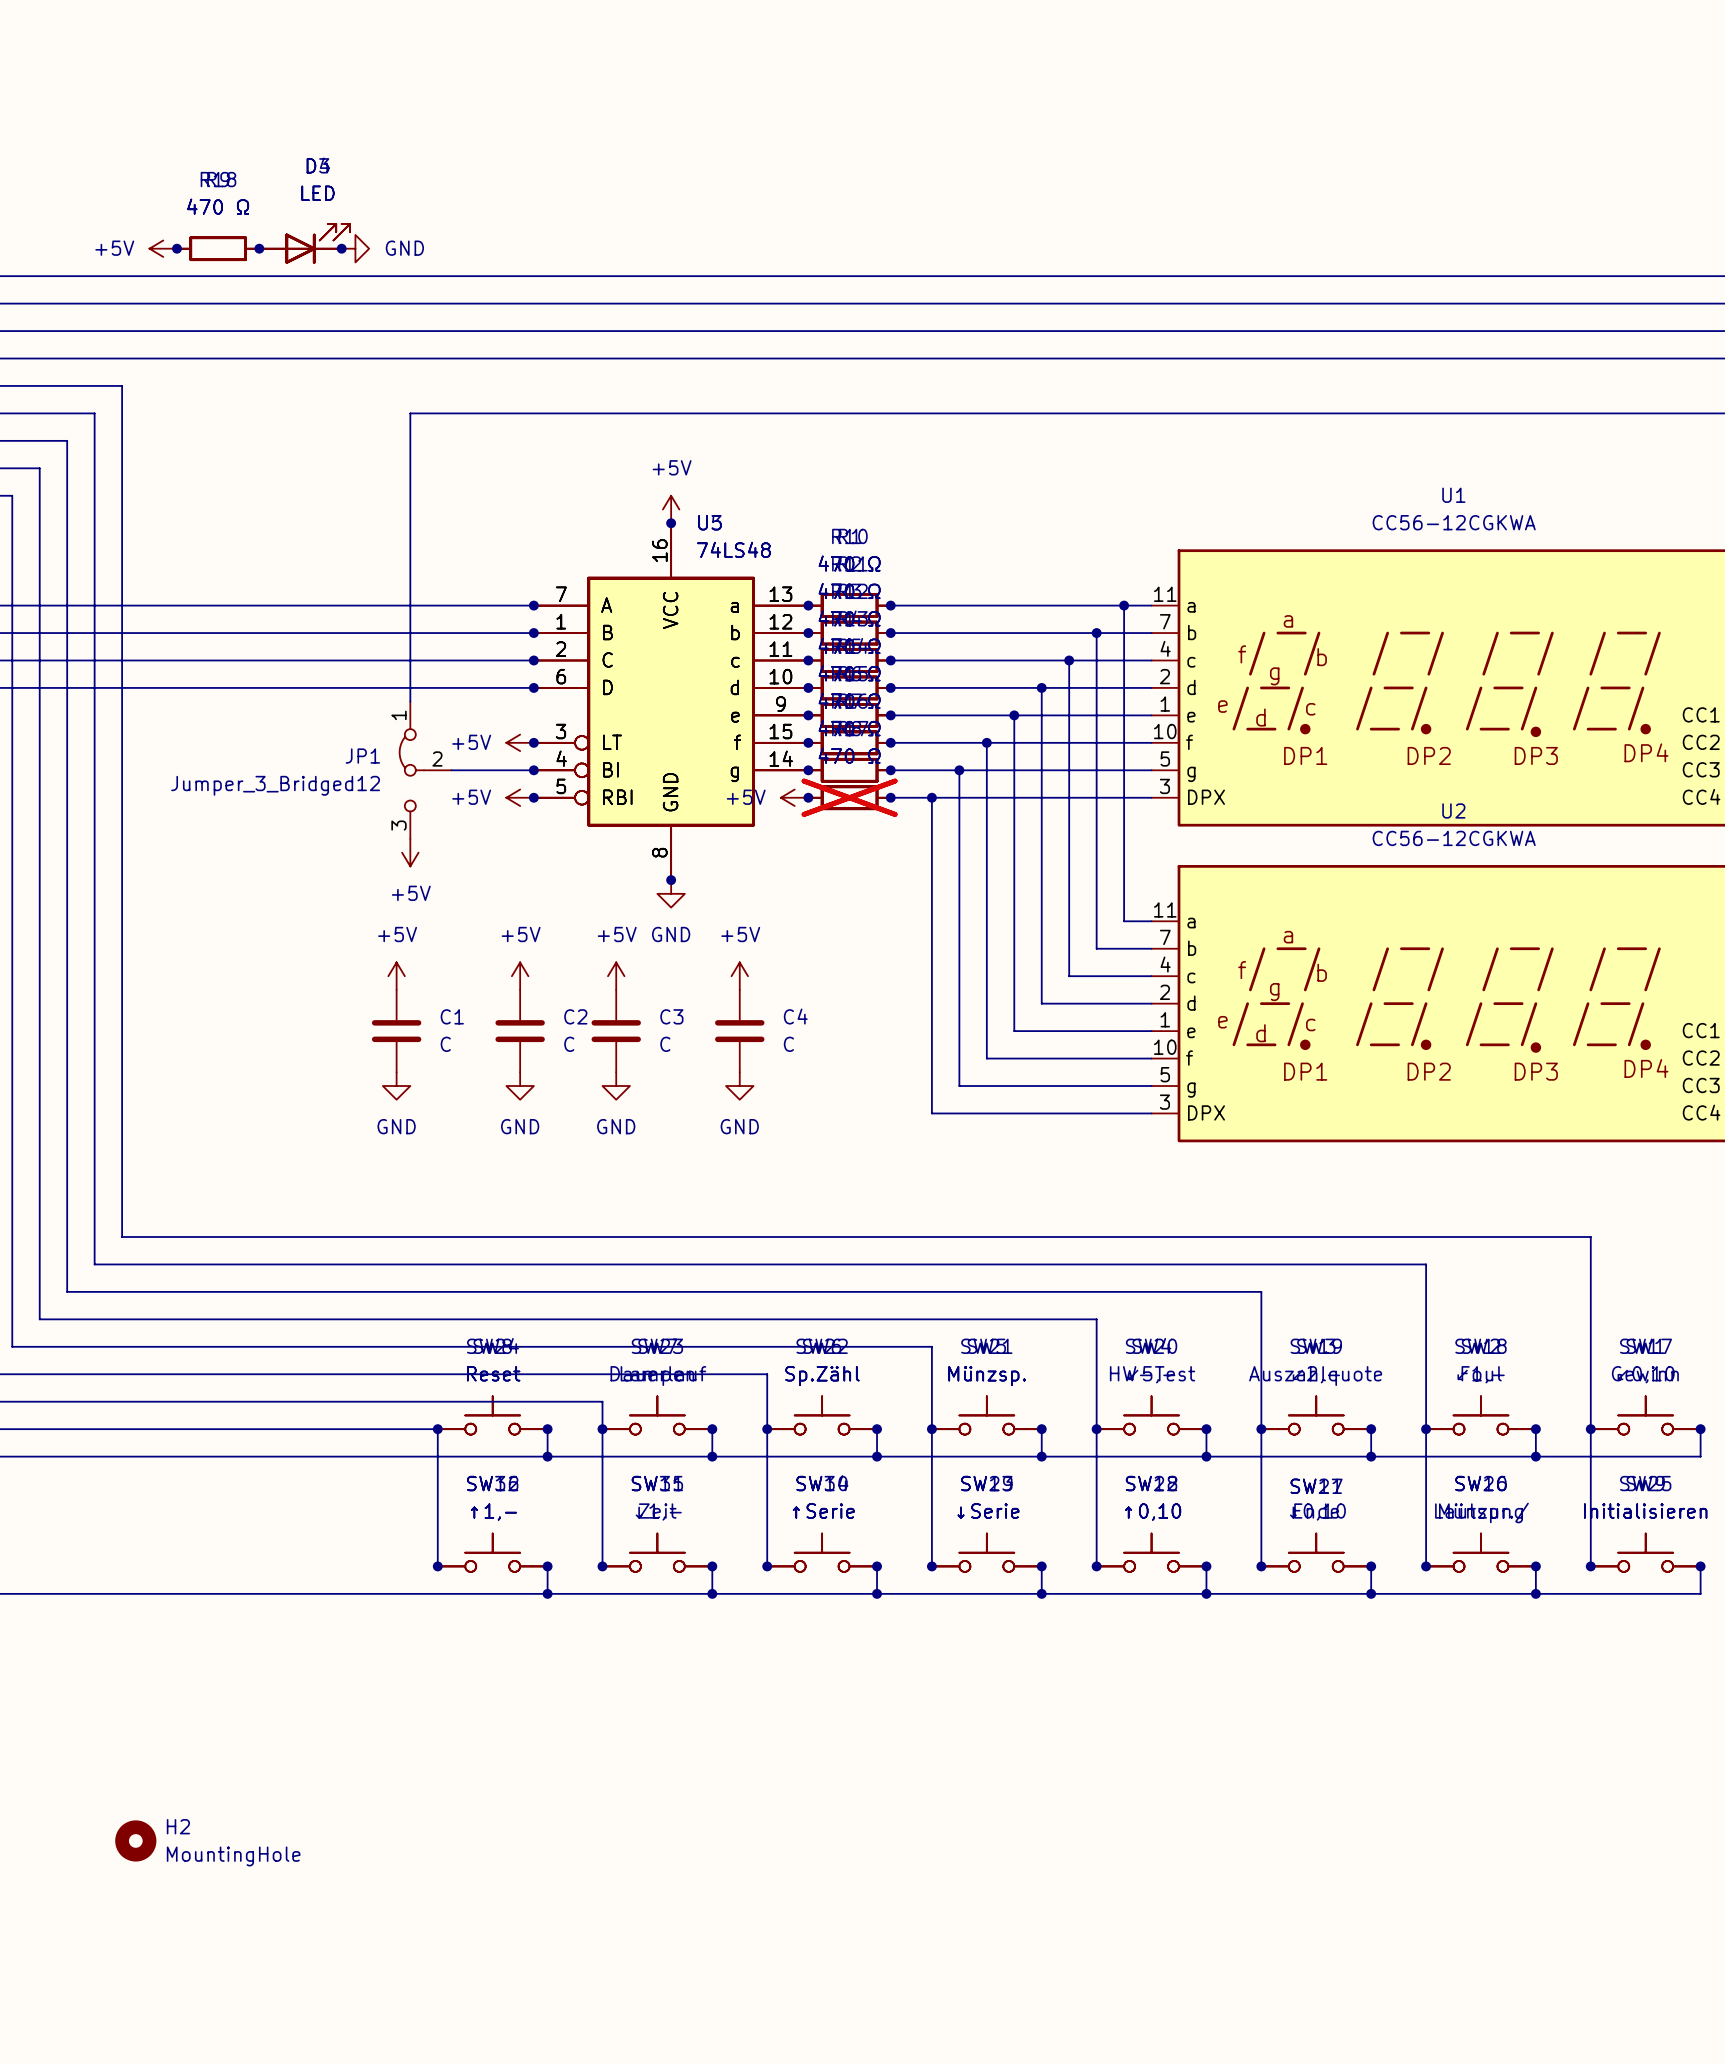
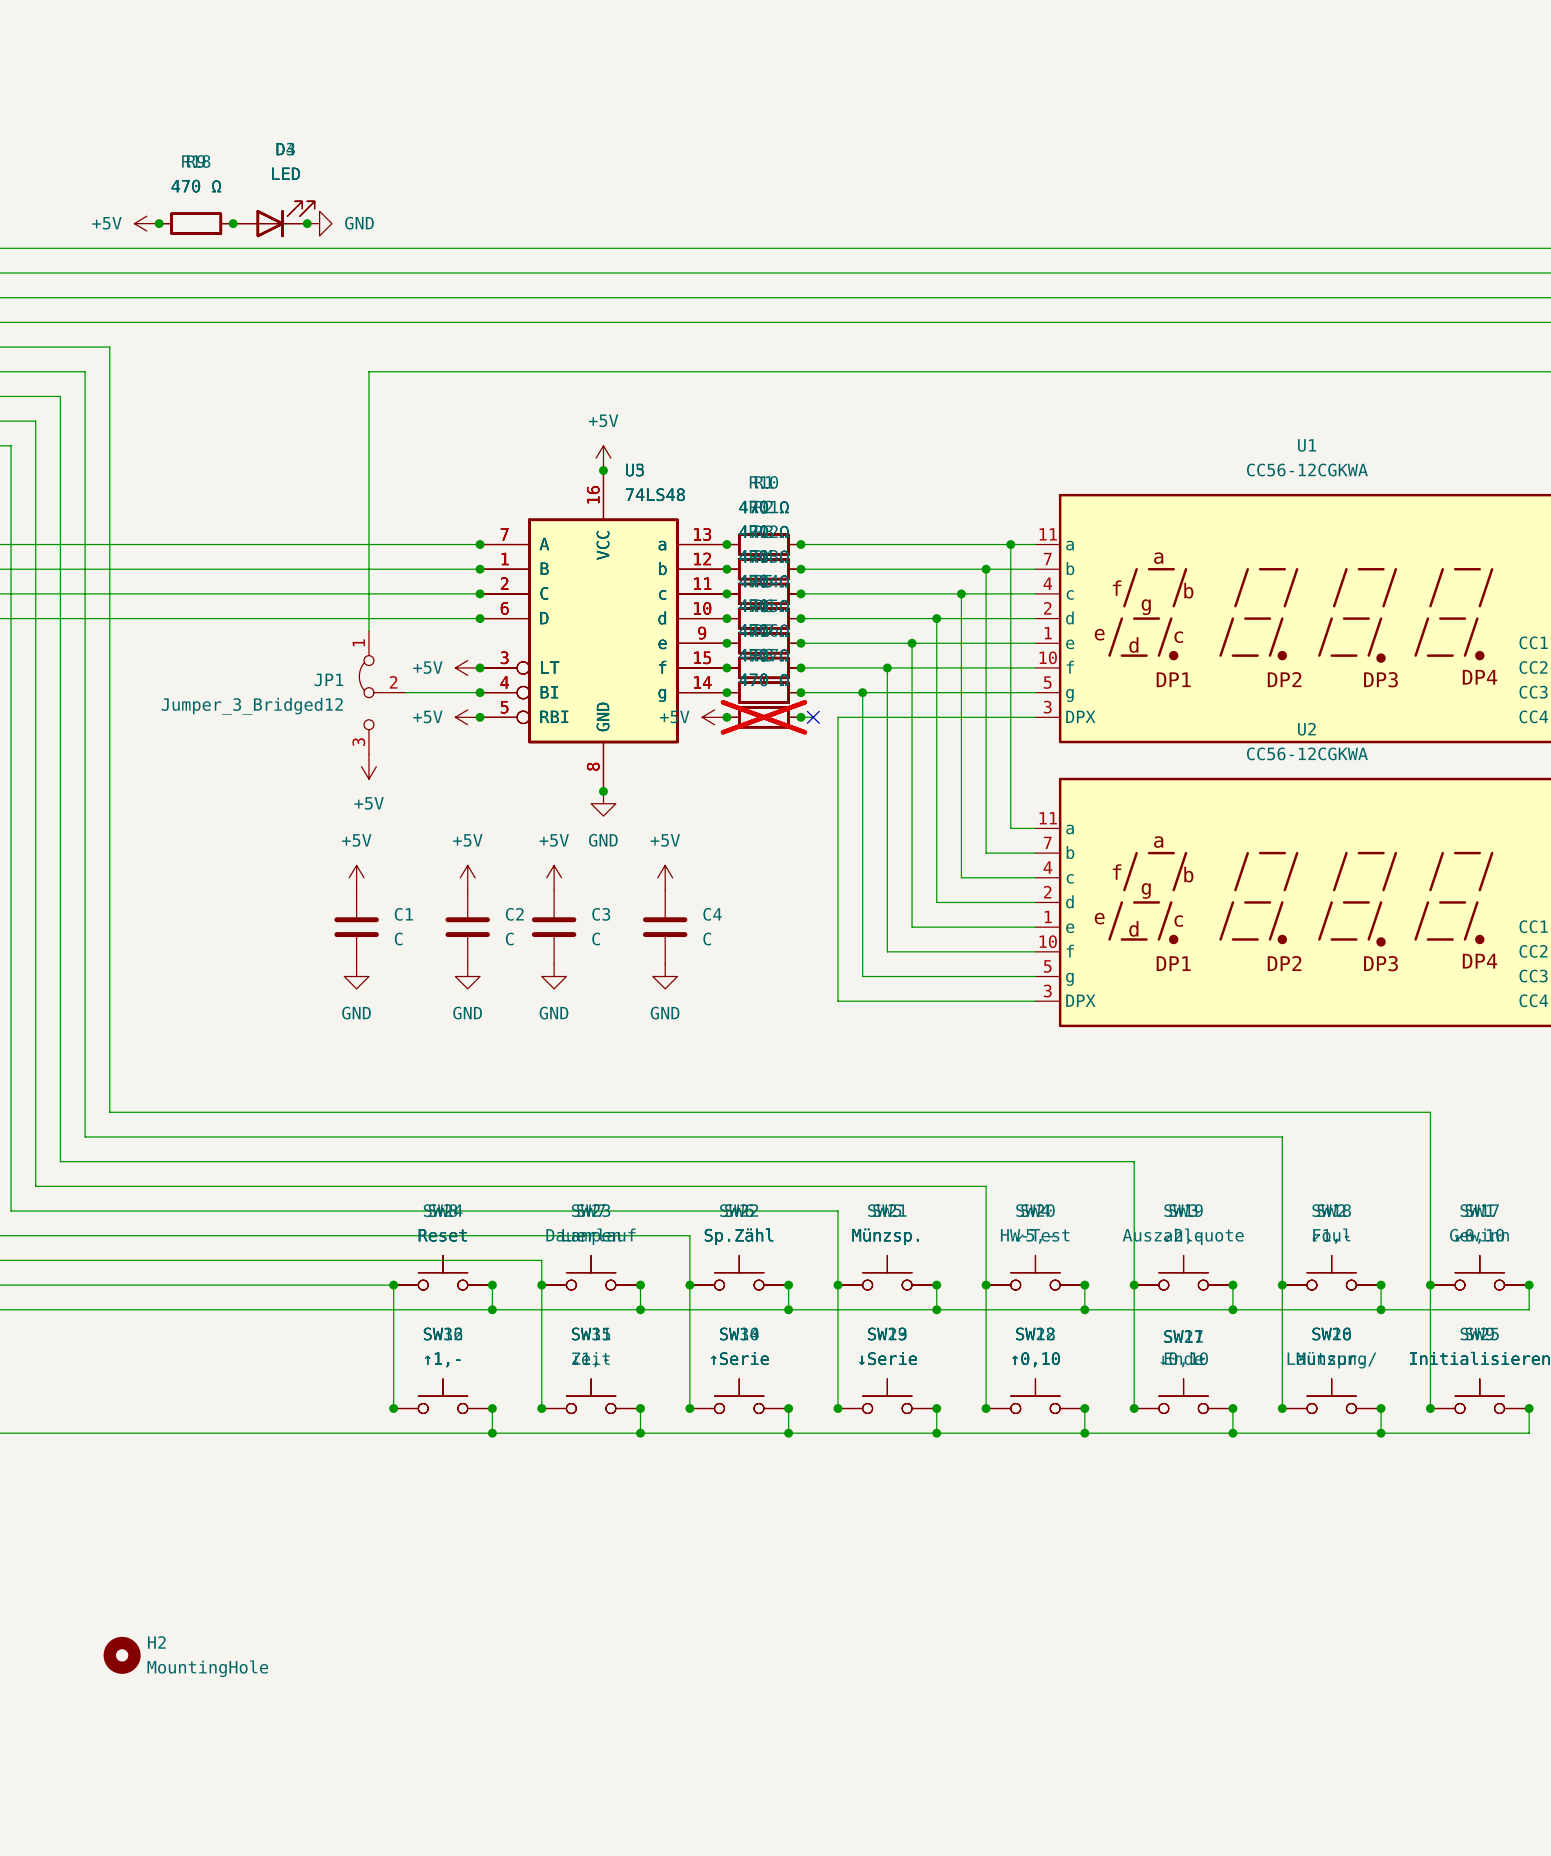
wire: (904, 797) (931, 797) -> none
no-connect mark: none -> (813, 717)
junction: (931, 797) -> none

